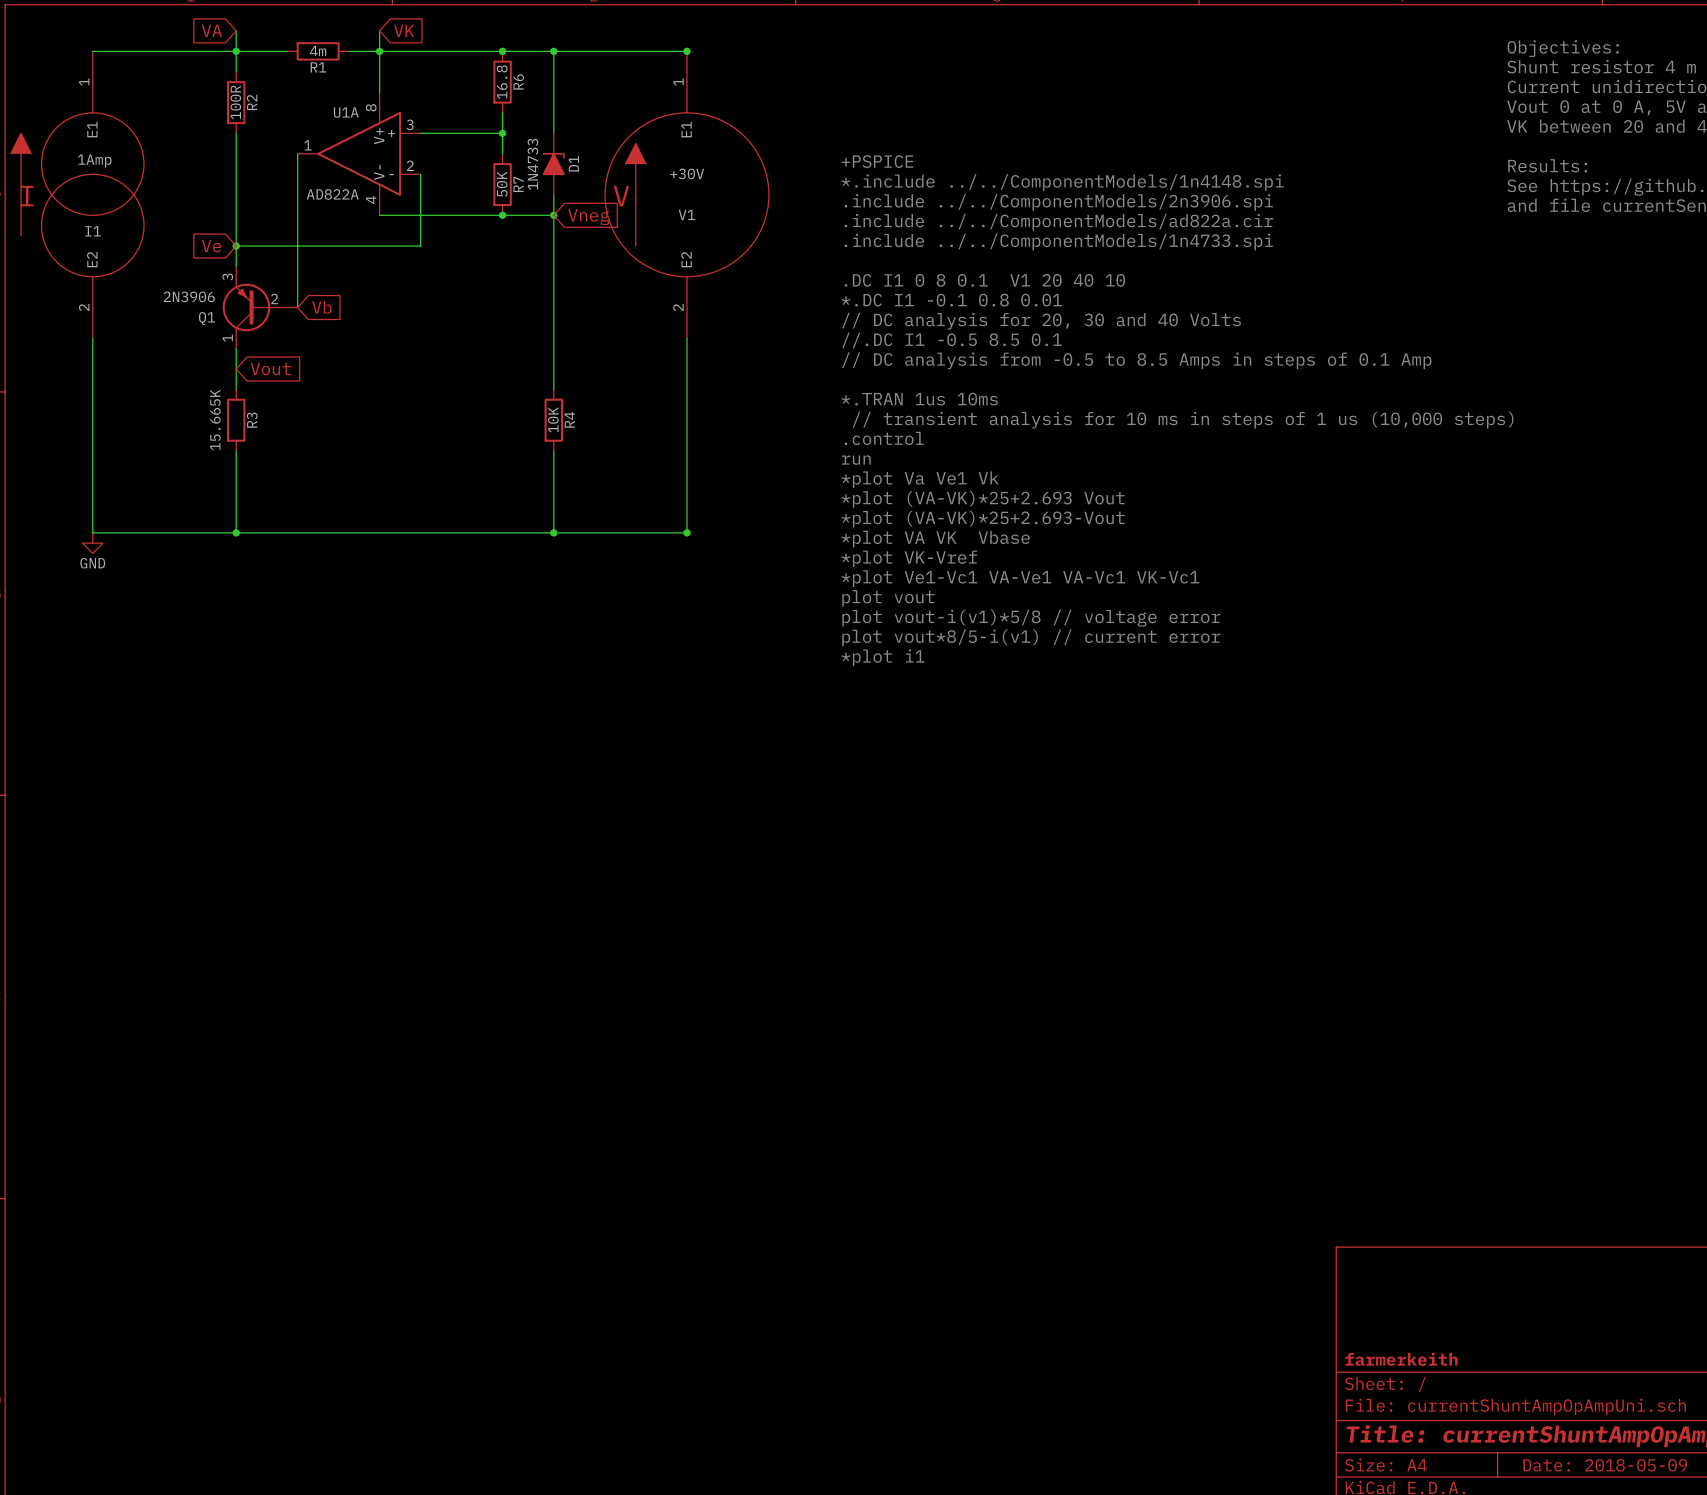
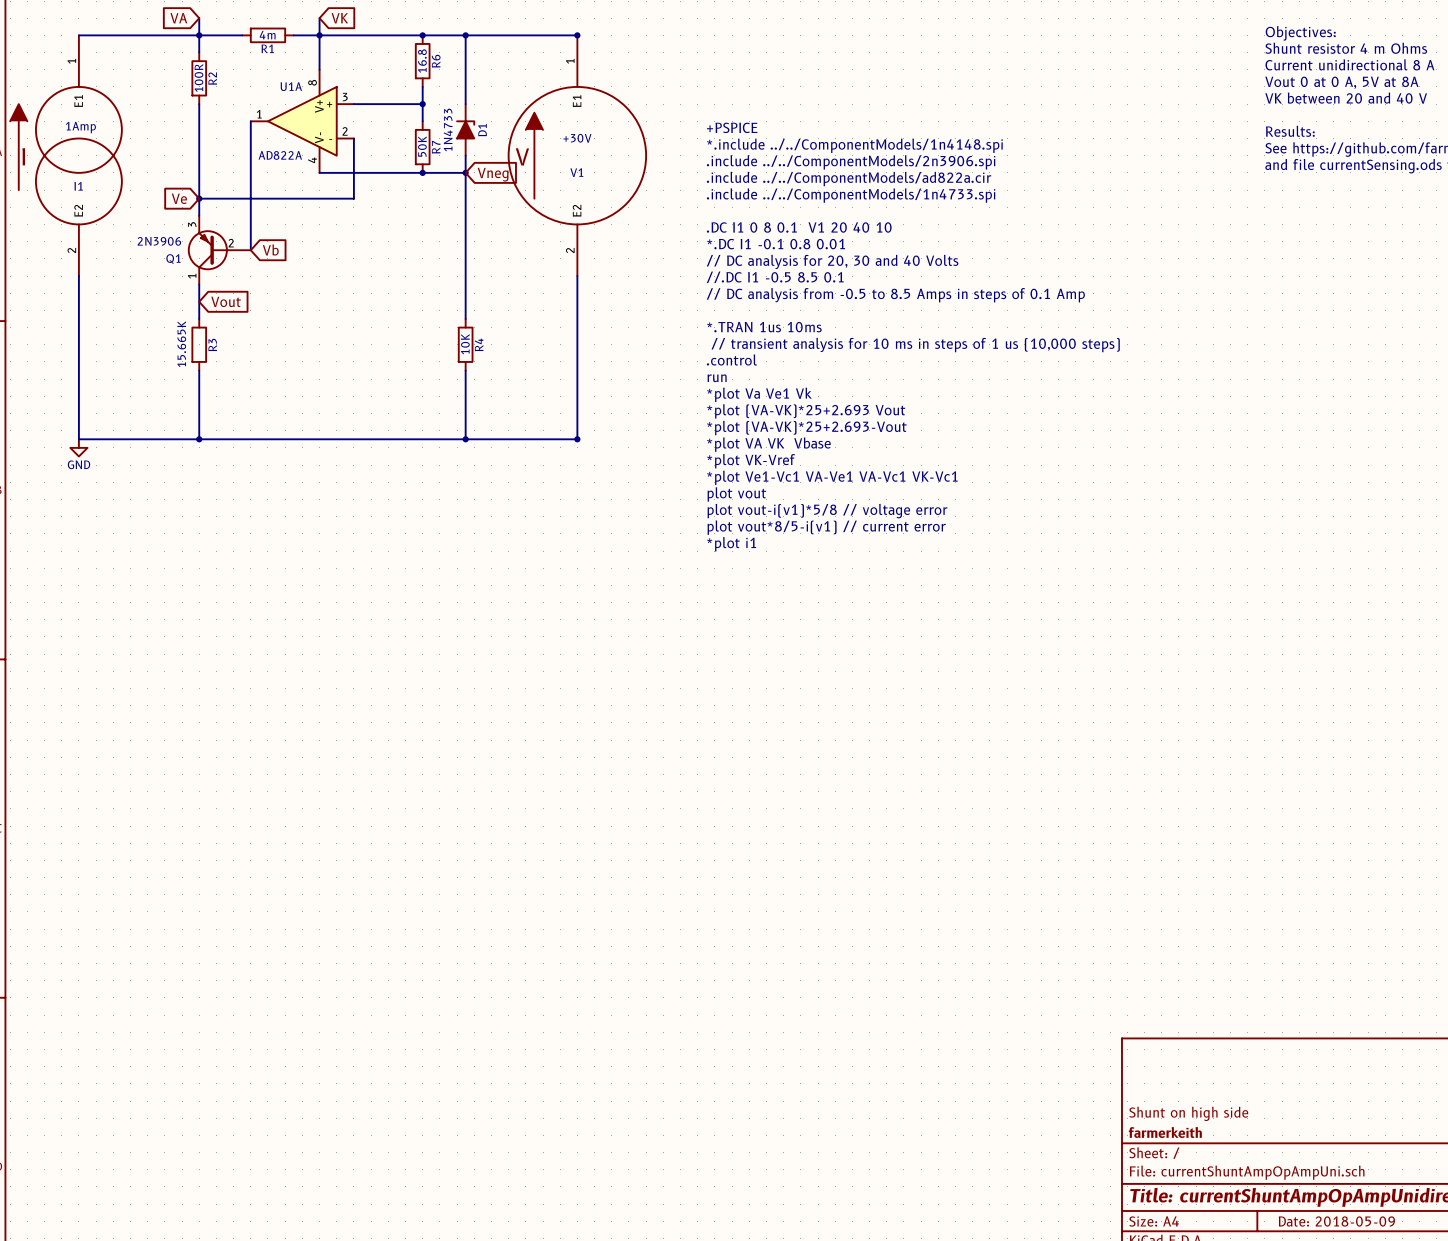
title block: none -> Shunt on high side (1188, 1113)

